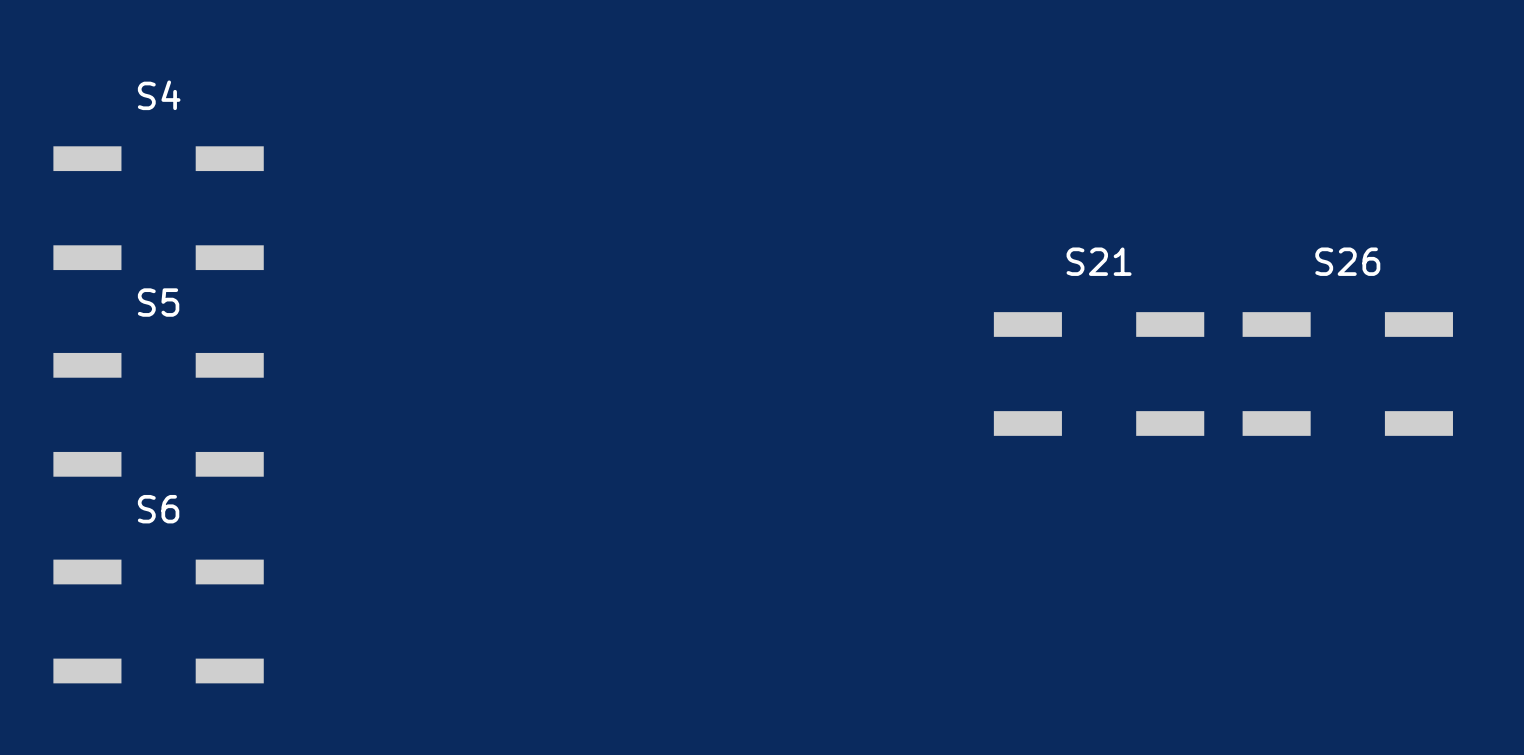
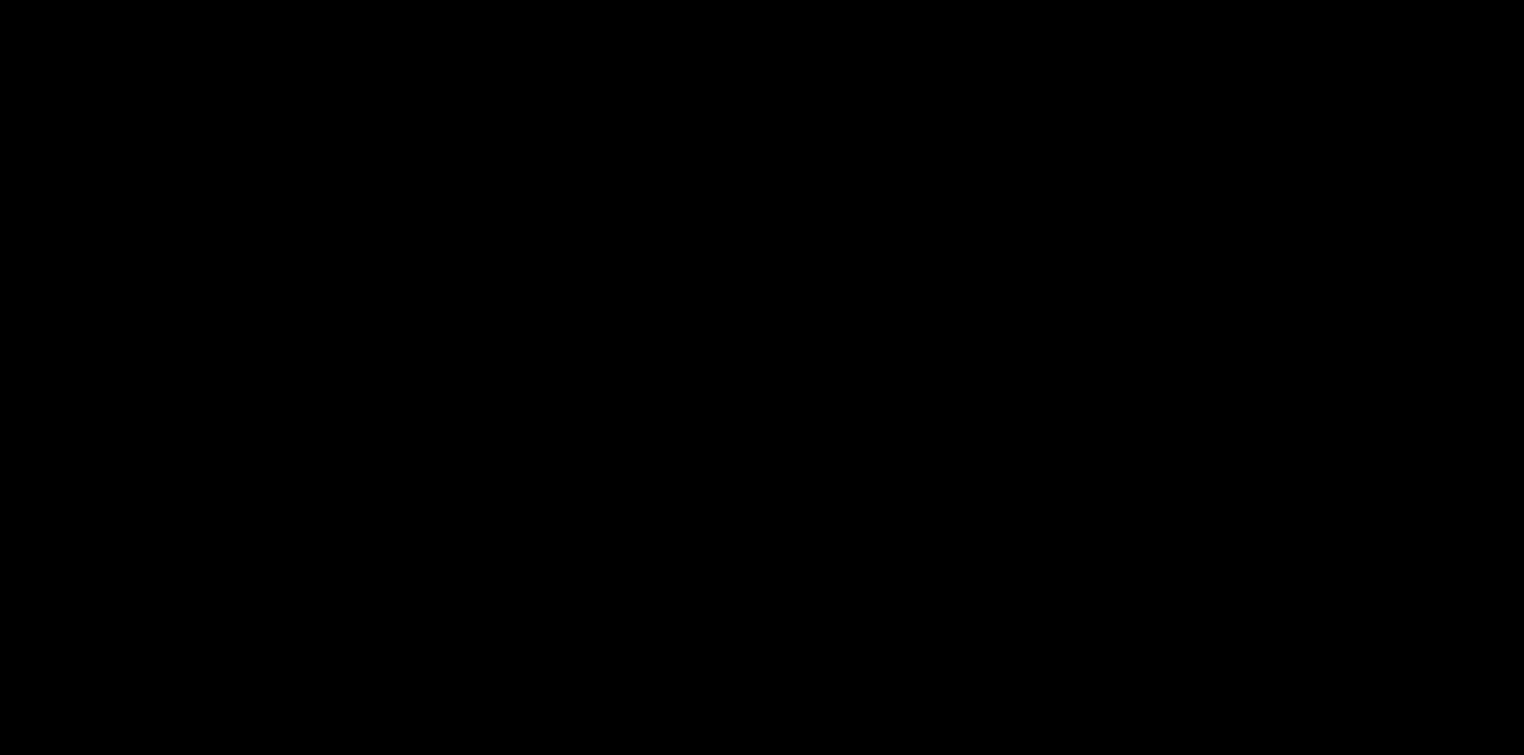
S4: (158, 208) -> none
S21: (1099, 373) -> none
S26: (1347, 373) -> none
S5: (158, 414) -> none
S6: (158, 621) -> none

